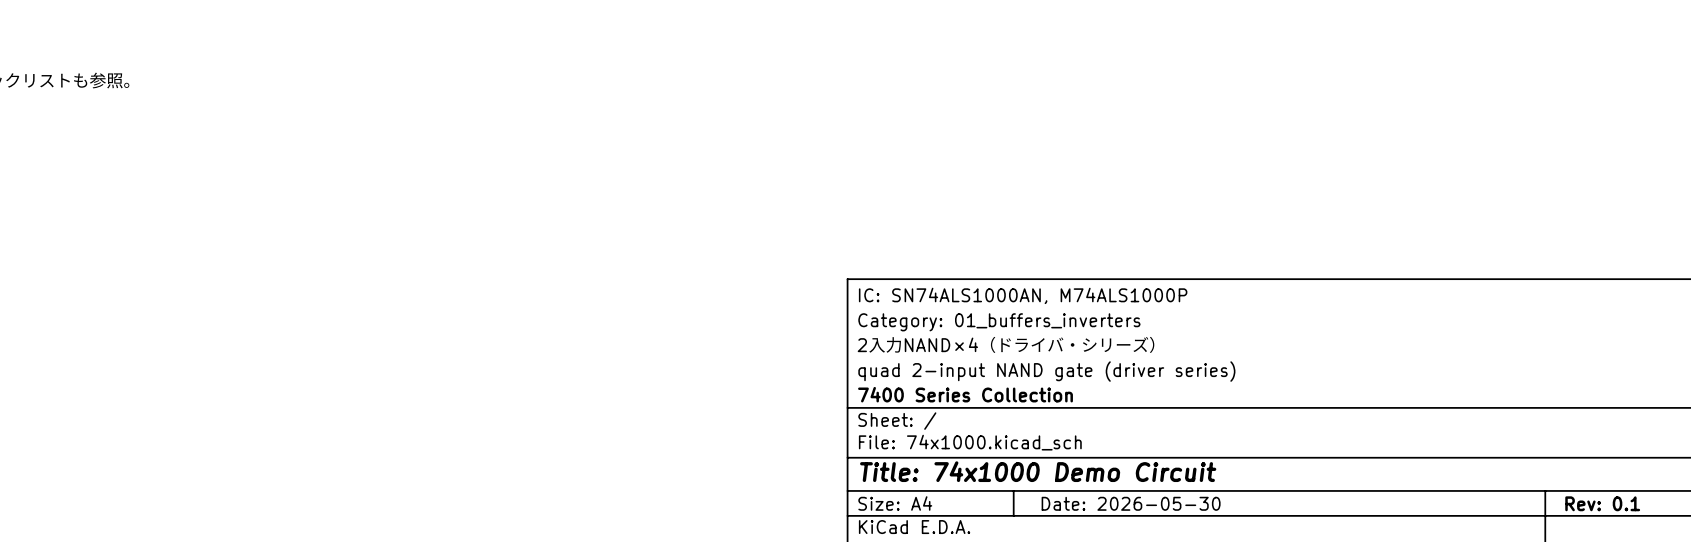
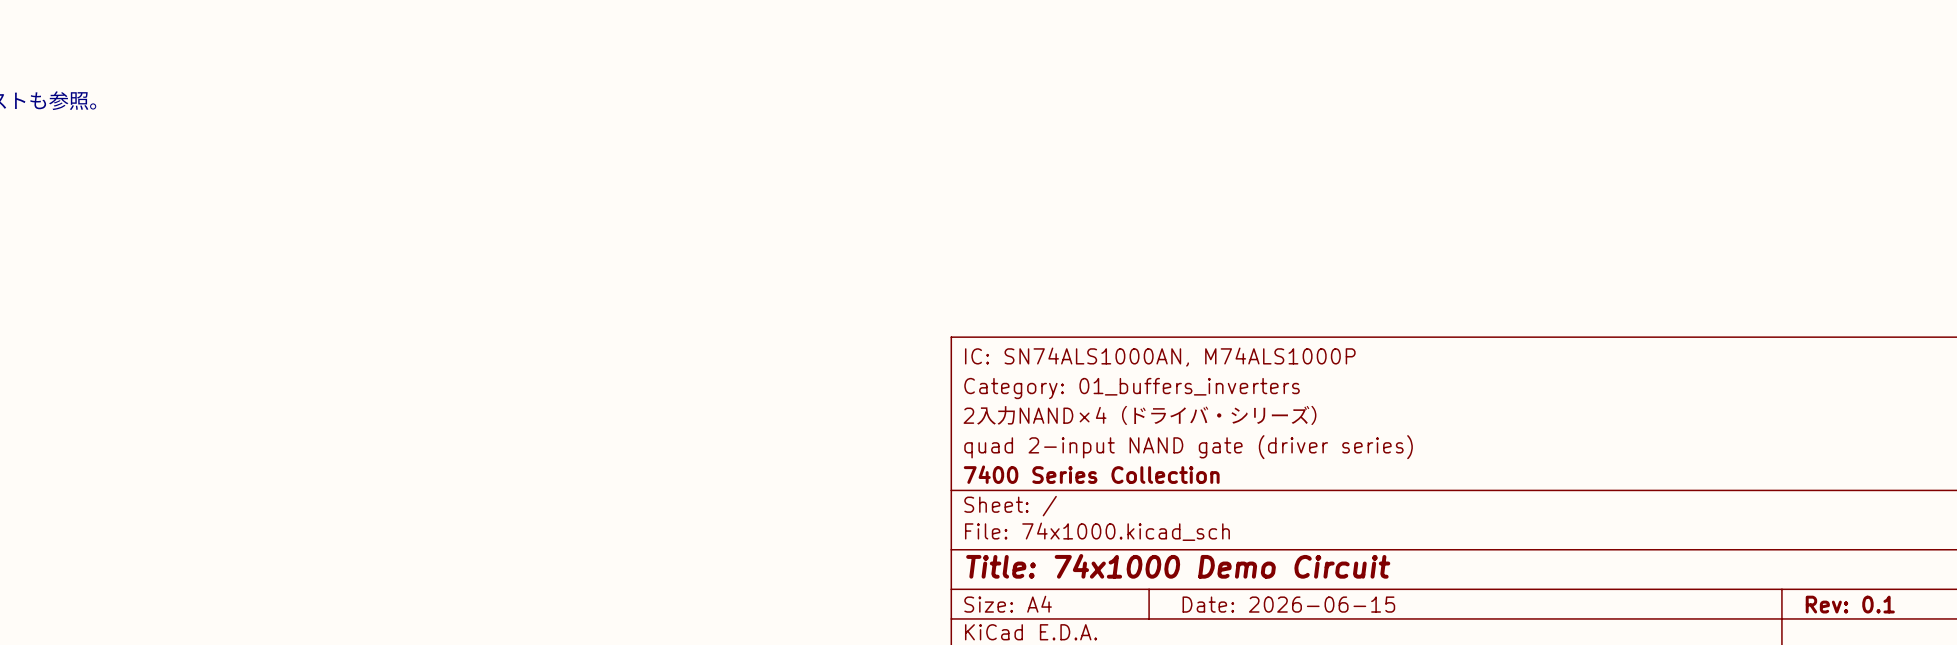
title block: Date: 2026-05-30 (1131, 503) -> Date: 2026-06-15 (1288, 604)

